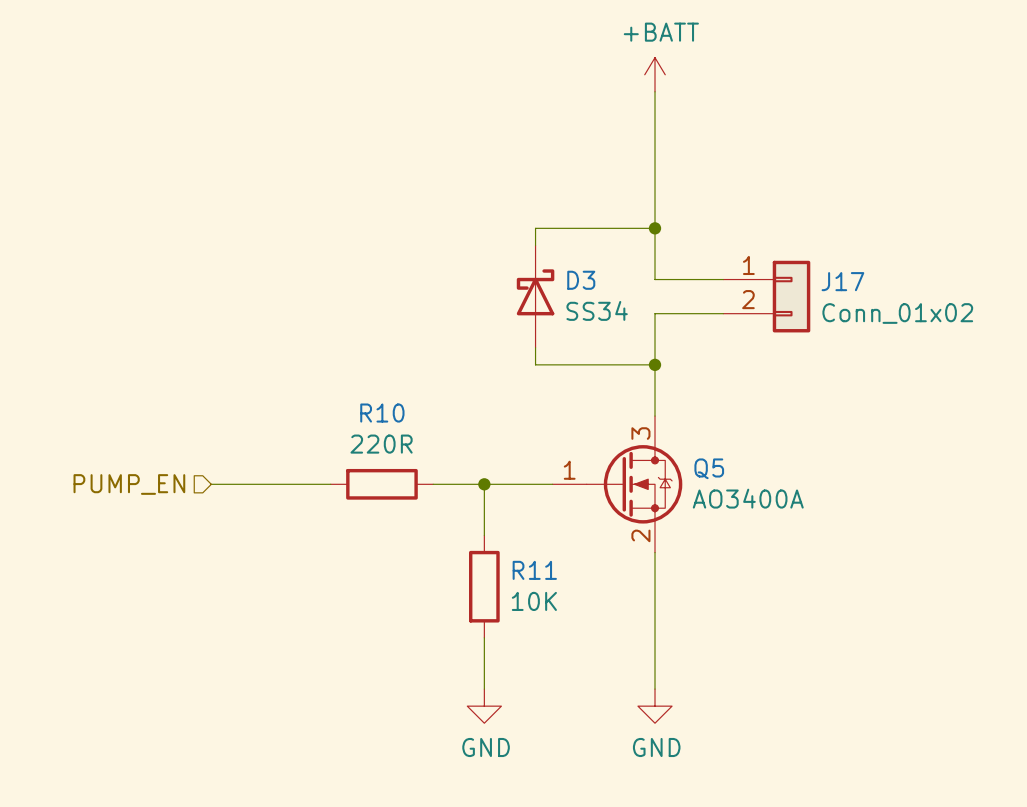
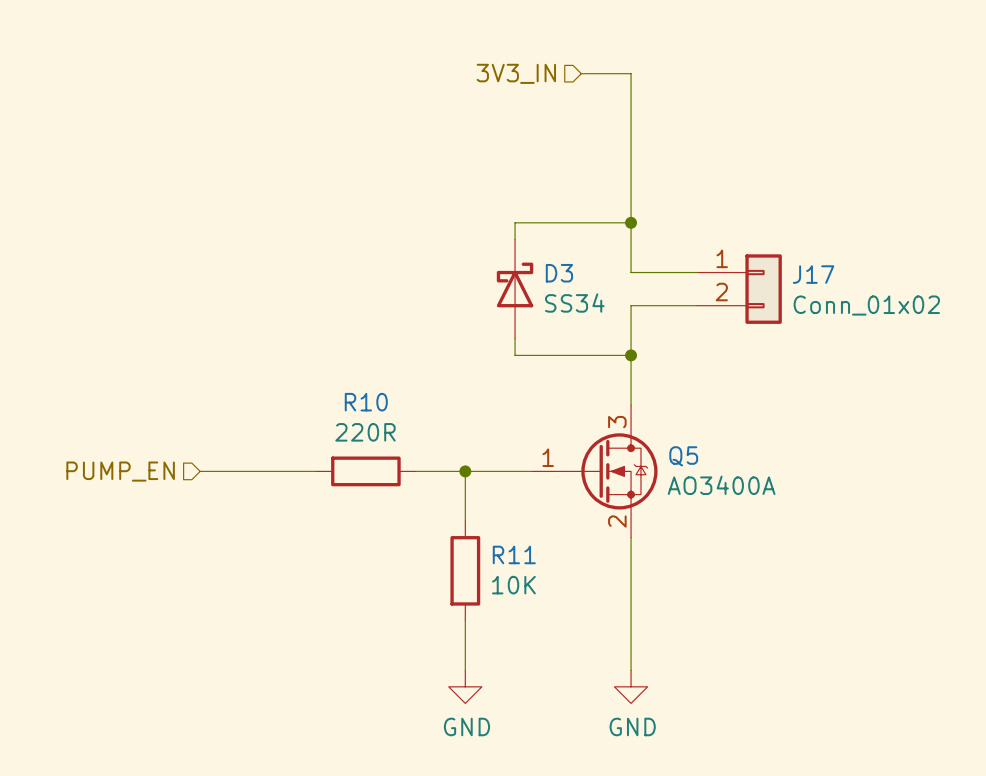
hierarchical label: none -> 3V3_IN (516, 73)
wire: none -> (581, 73) (631, 73) (631, 90)
power symbol: +BATT (655, 74) -> none

